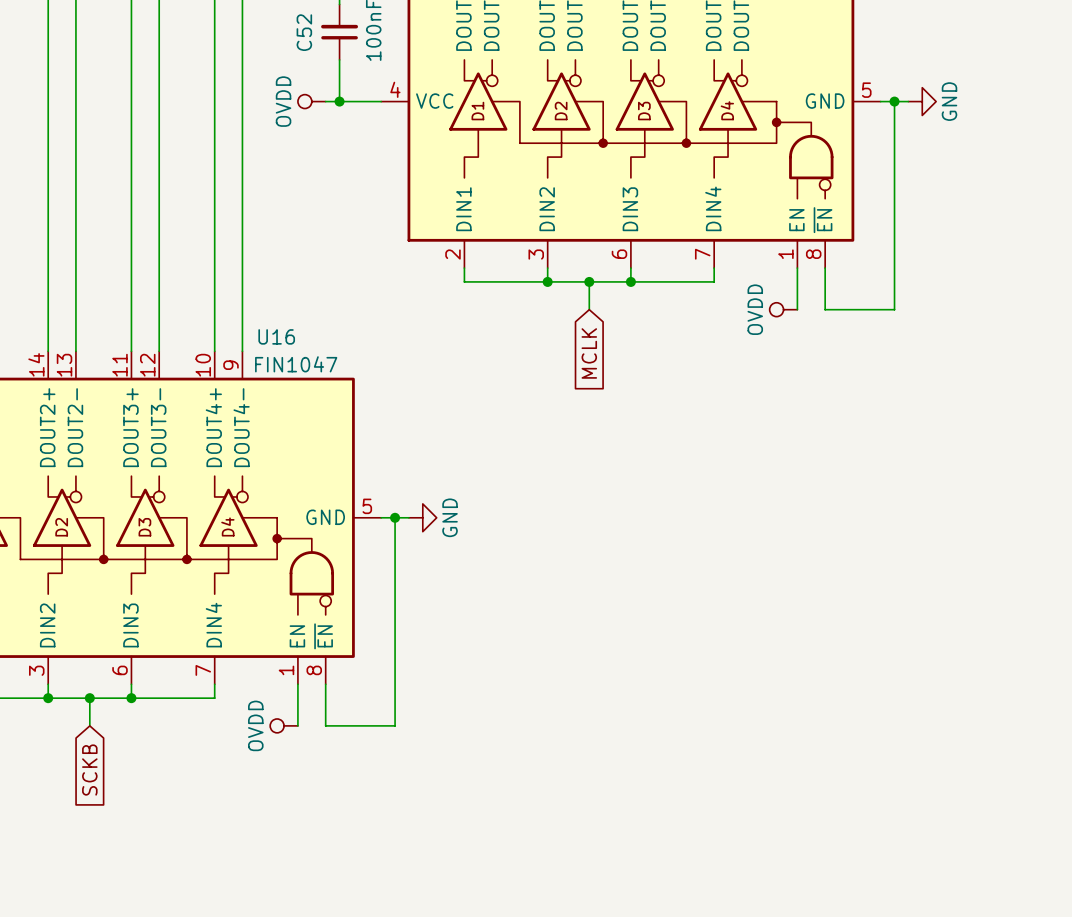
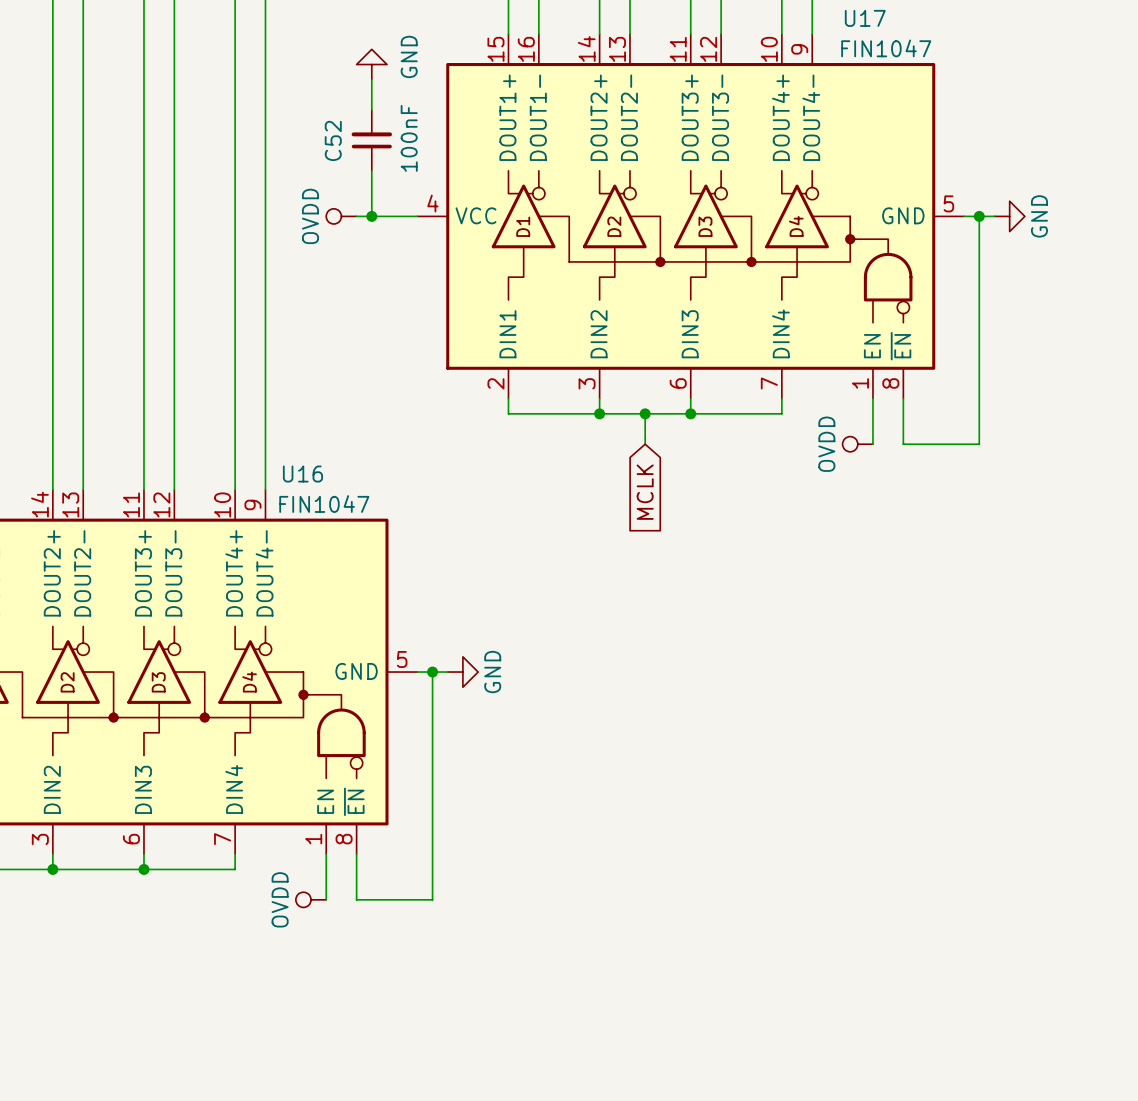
wire: (89, 698) (89, 725) -> none
junction: (89, 698) -> none
global label: SCKB (89, 770) -> none

